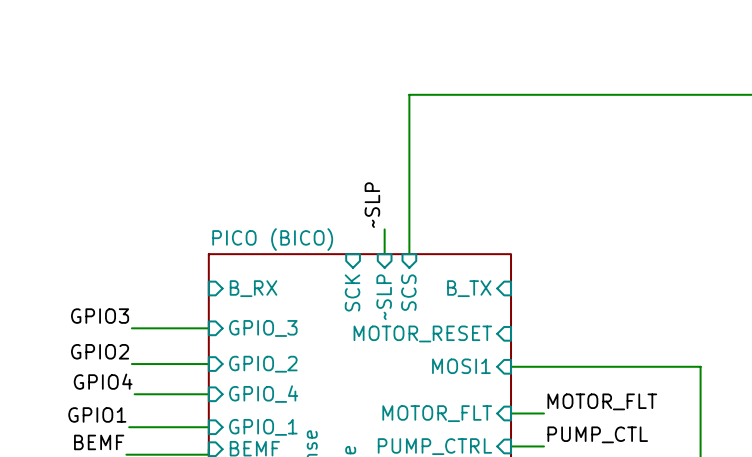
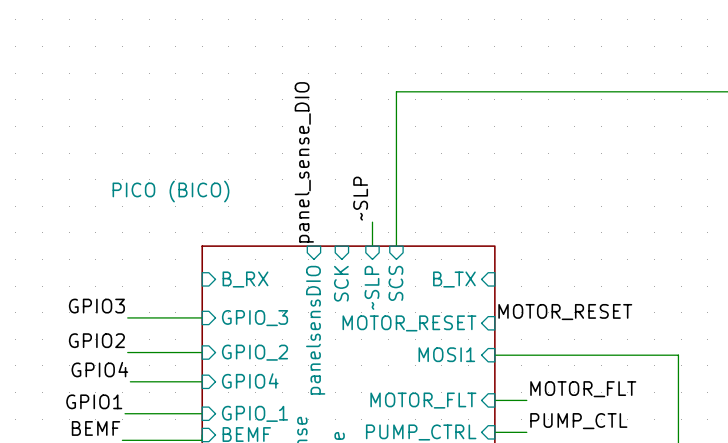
label: none -> panel_sense_DIO (304, 162)
sheet PICO (BICO) name position: PICO (BICO) (272, 239) -> PICO (BICO) (170, 191)
label: none -> MOTOR_RESET (565, 312)
sheet pin: none -> panelsensDIO (315, 330)
sheet pin: GPIO_4 (263, 394) -> GPIO4 (250, 380)

